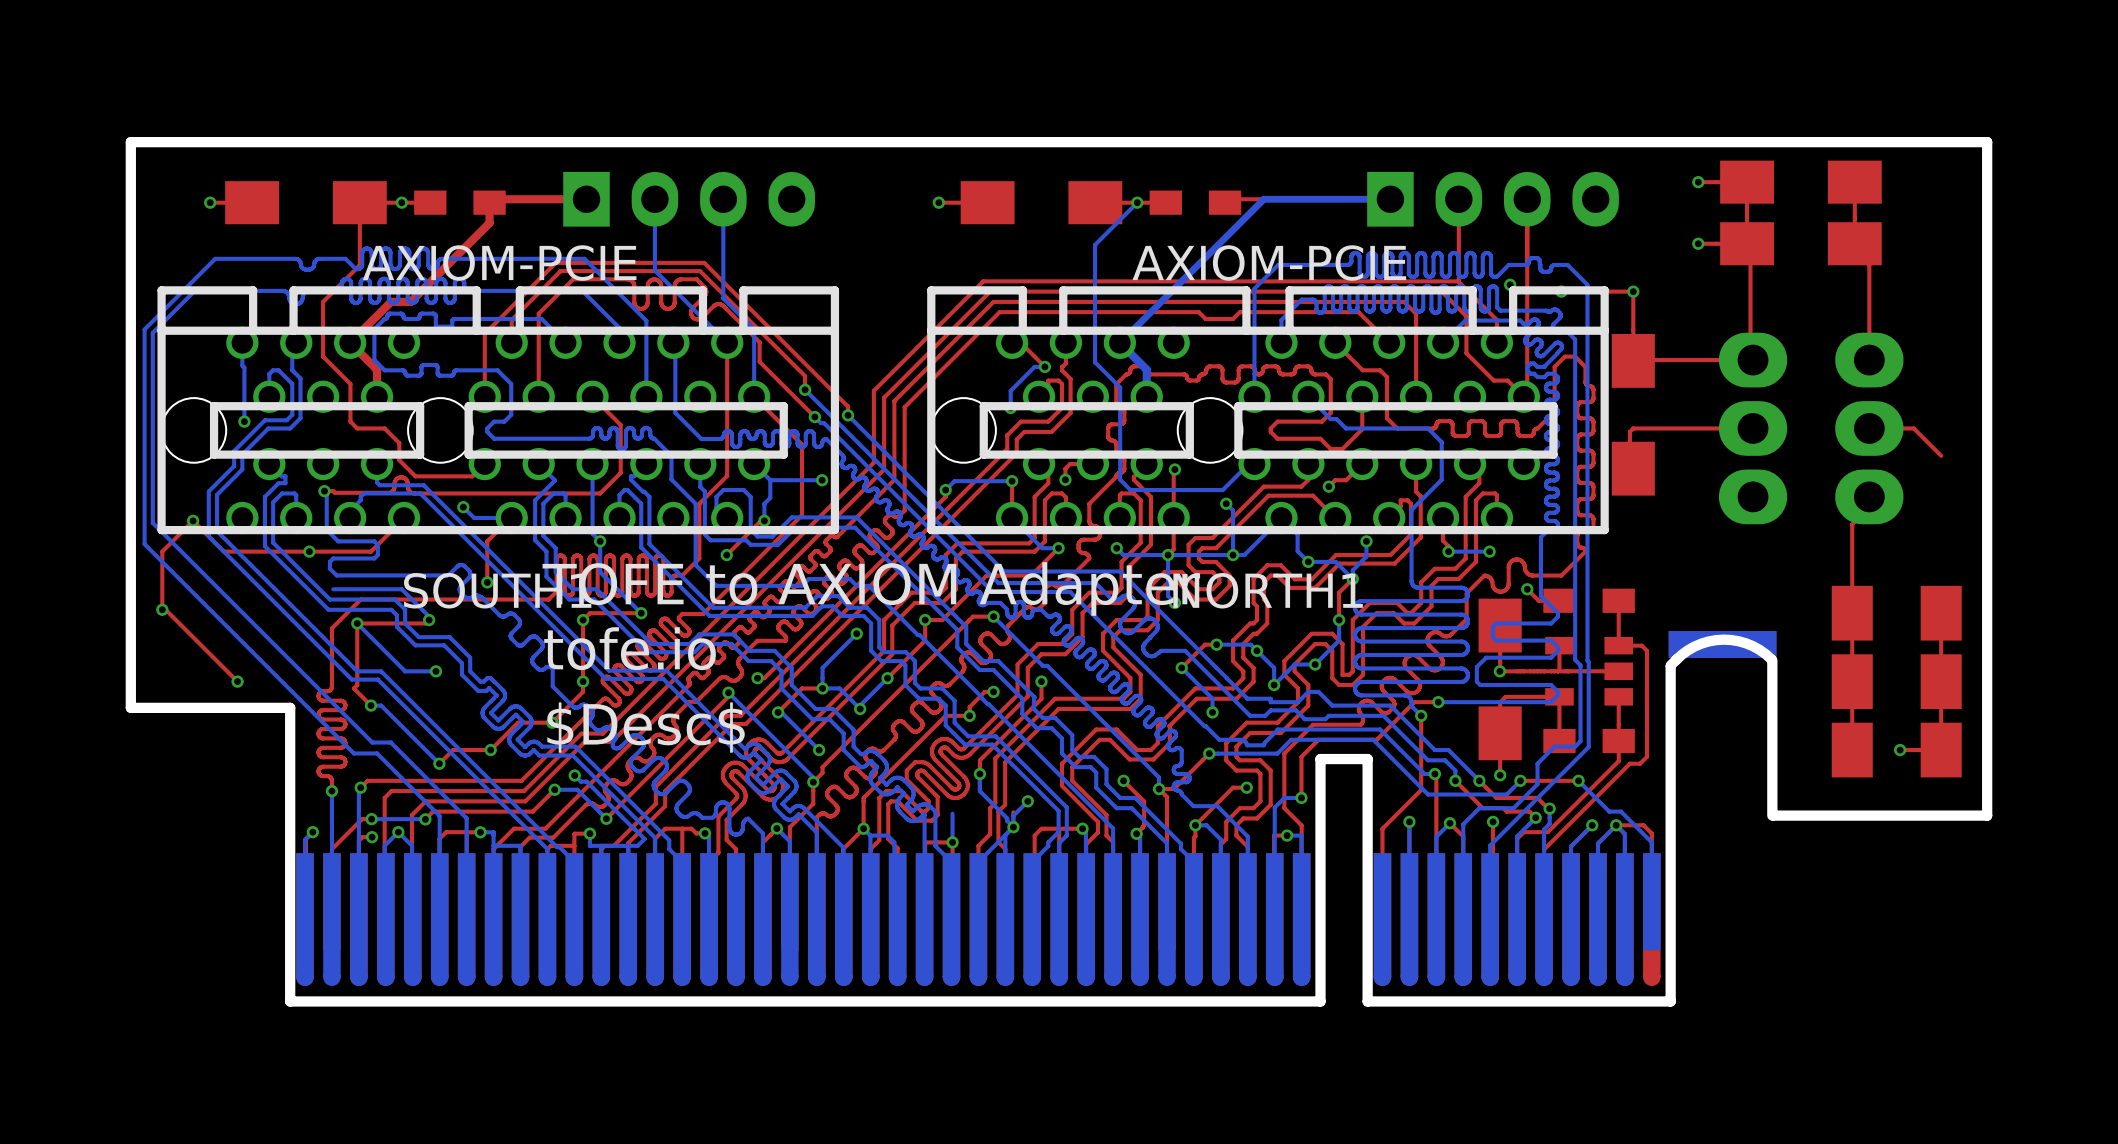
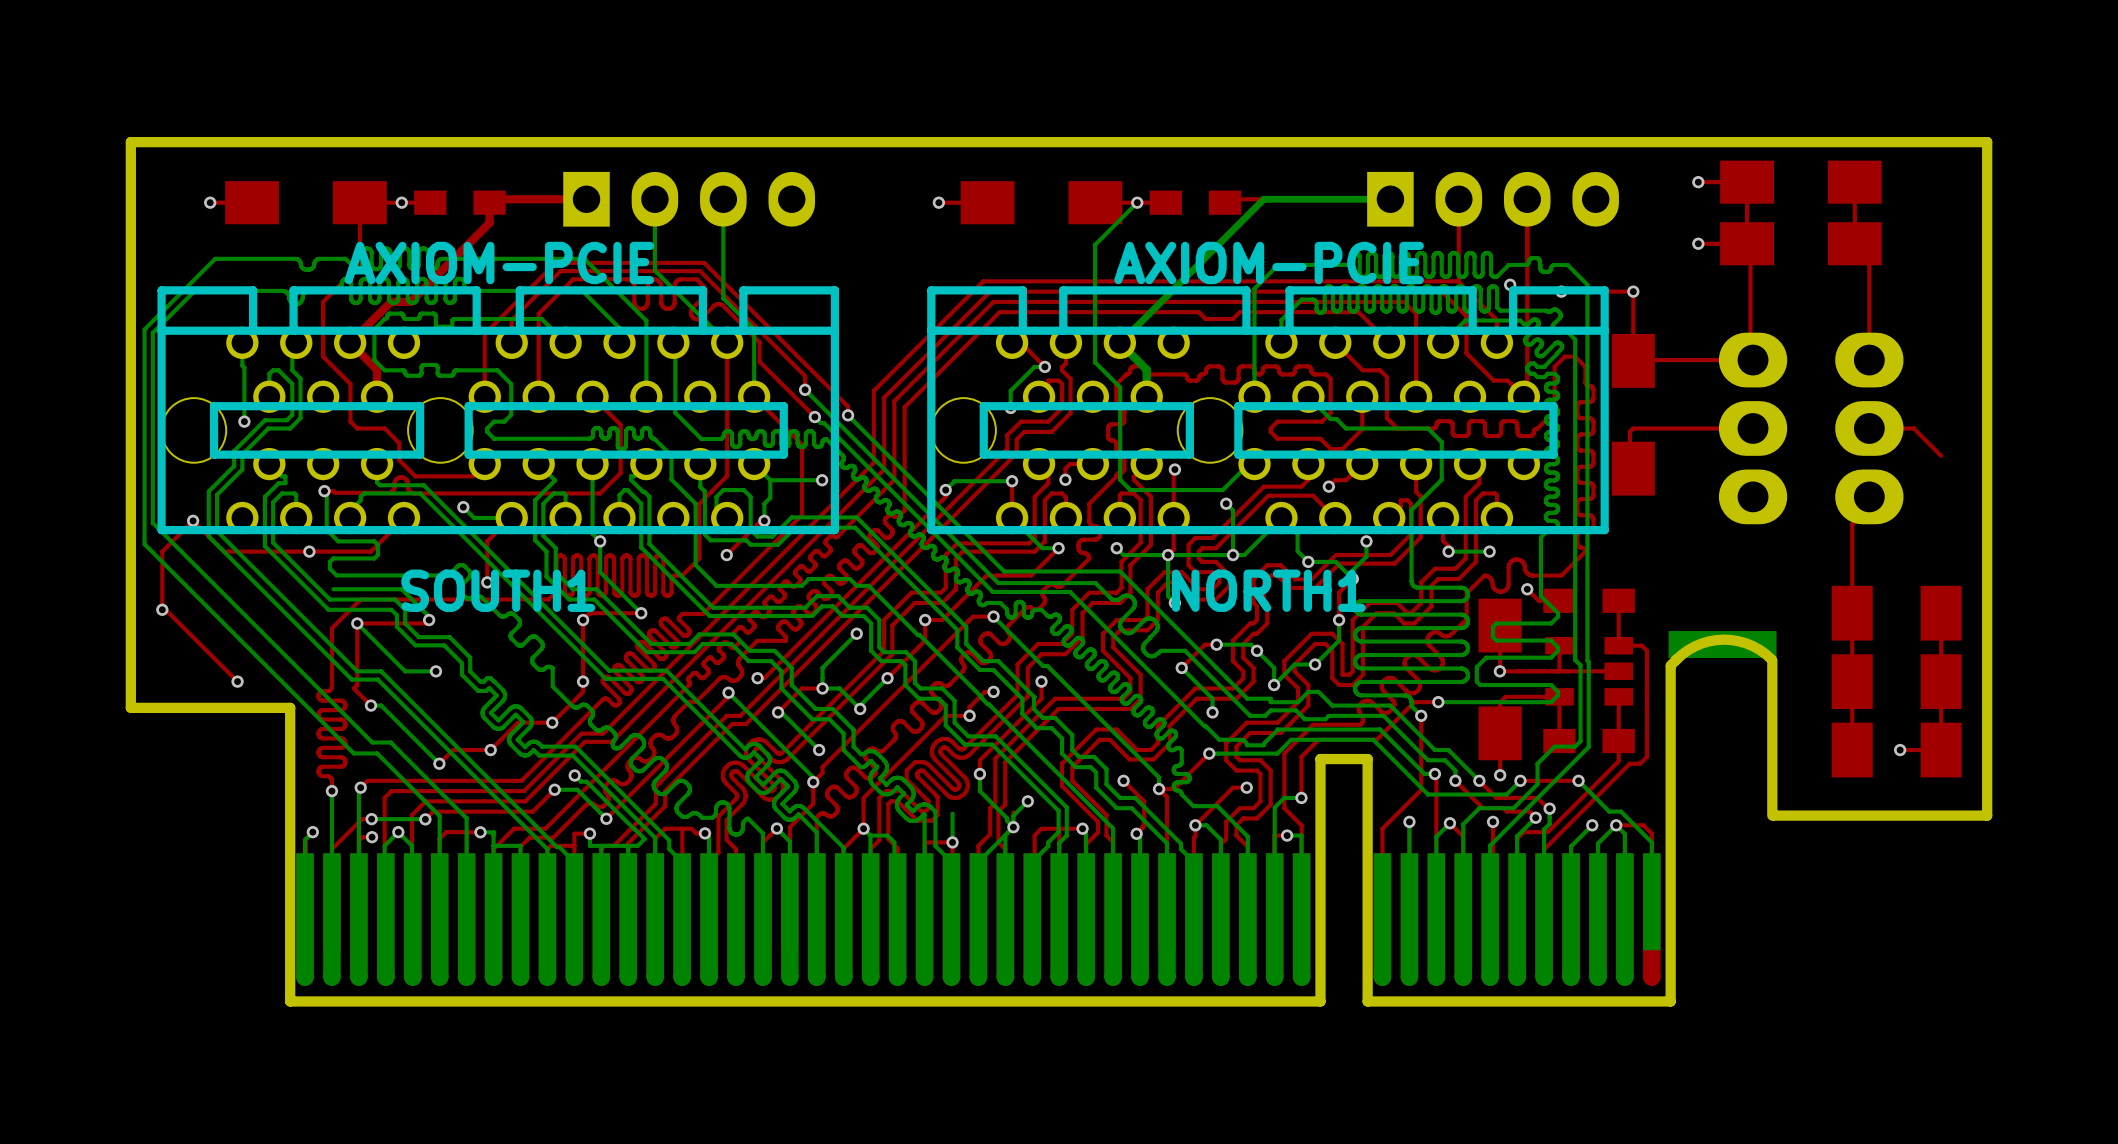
text: TOFE to AXIOM Adapter (871, 588) -> none
text: tofe.io (630, 648) -> none
text: $Desc$ (646, 727) -> none

